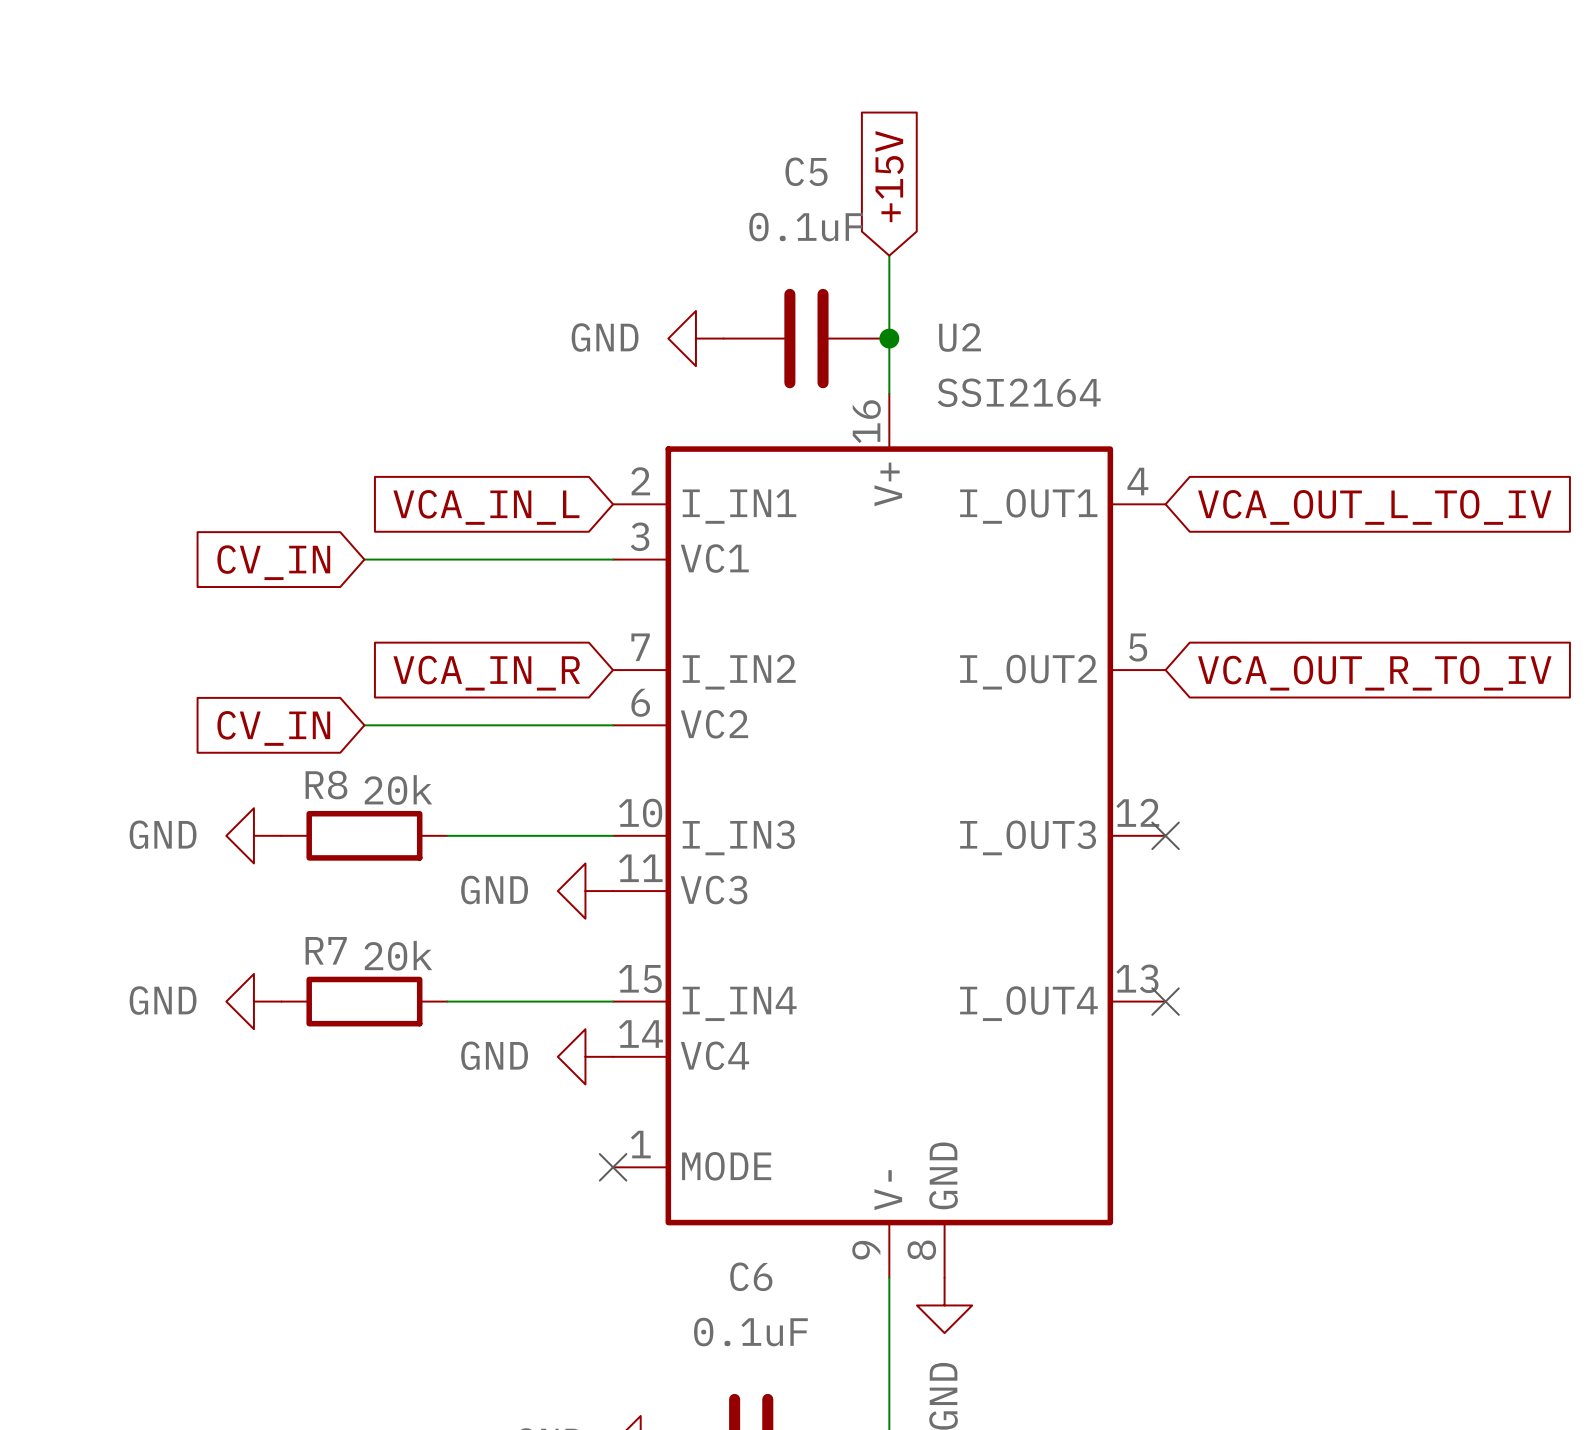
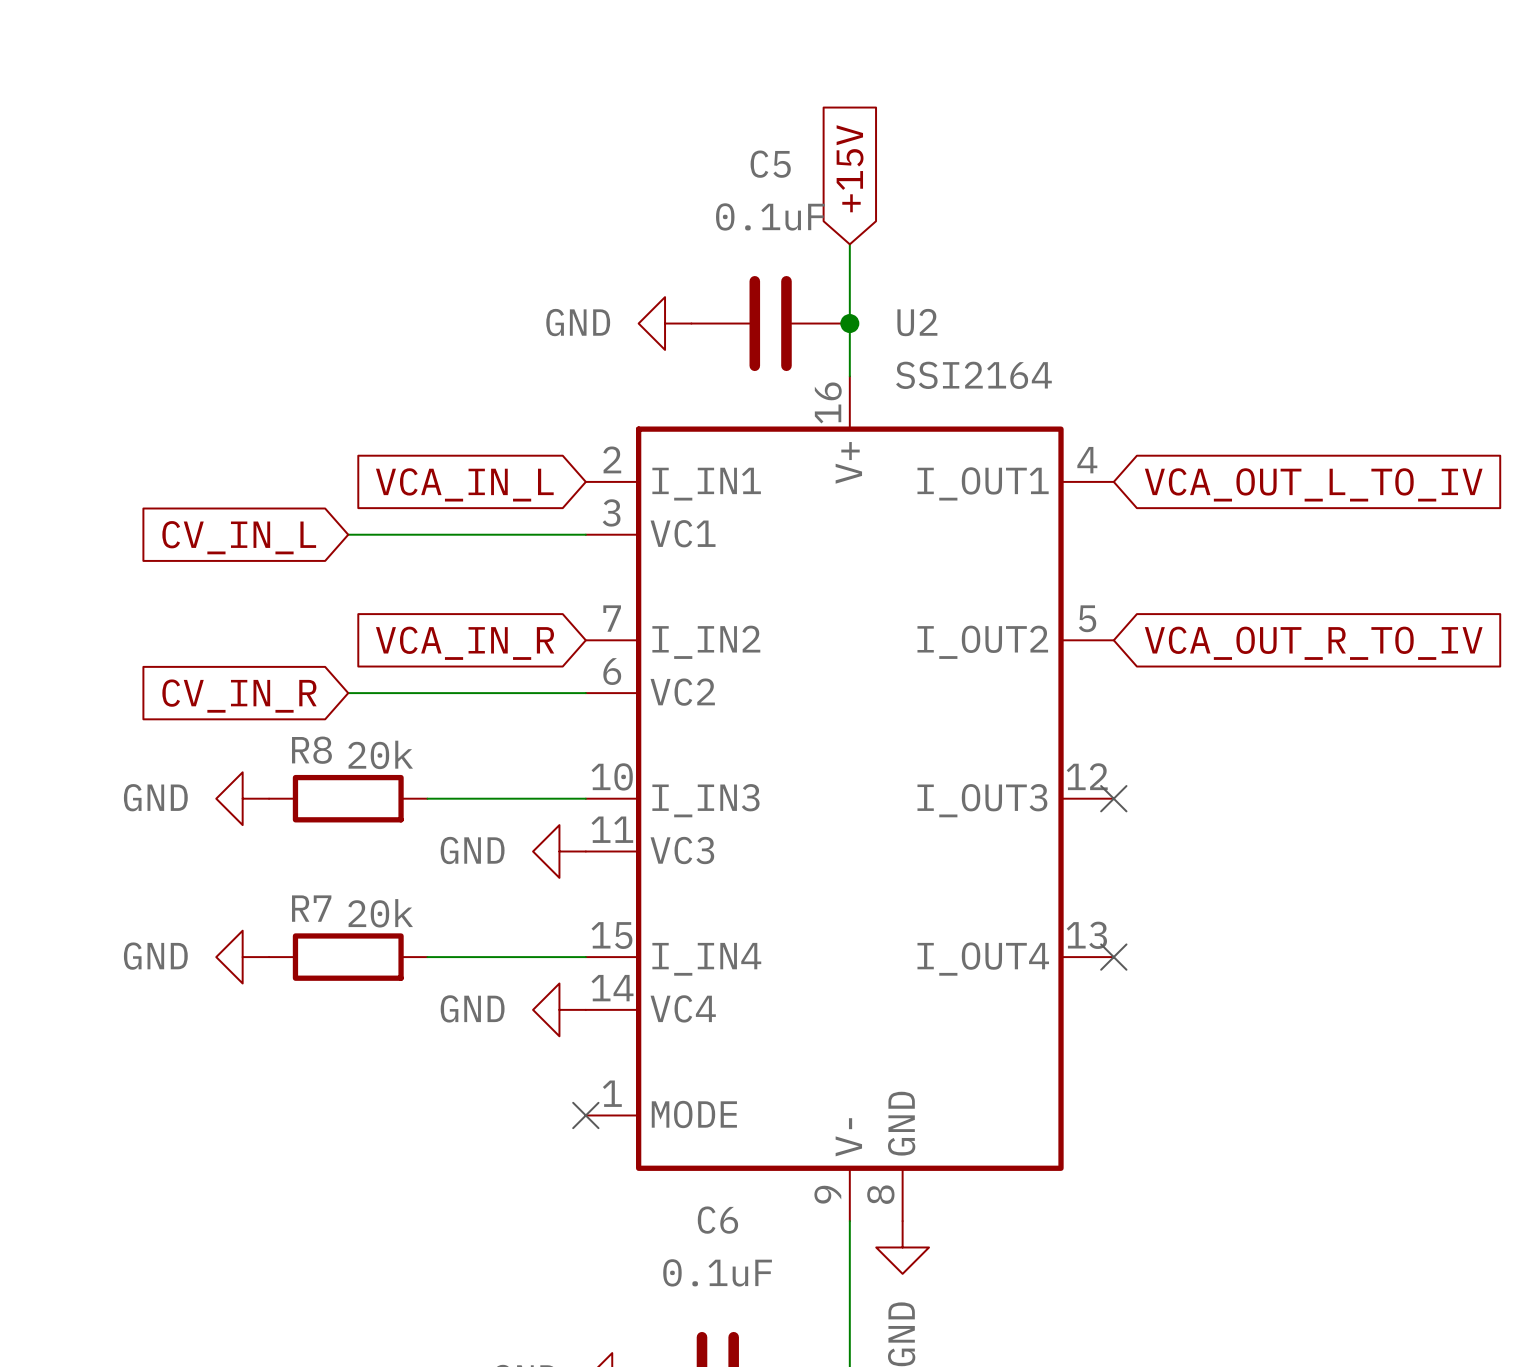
global label: CV_IN (273, 562) -> CV_IN_L (239, 537)
global label: CV_IN (273, 728) -> CV_IN_R (239, 696)

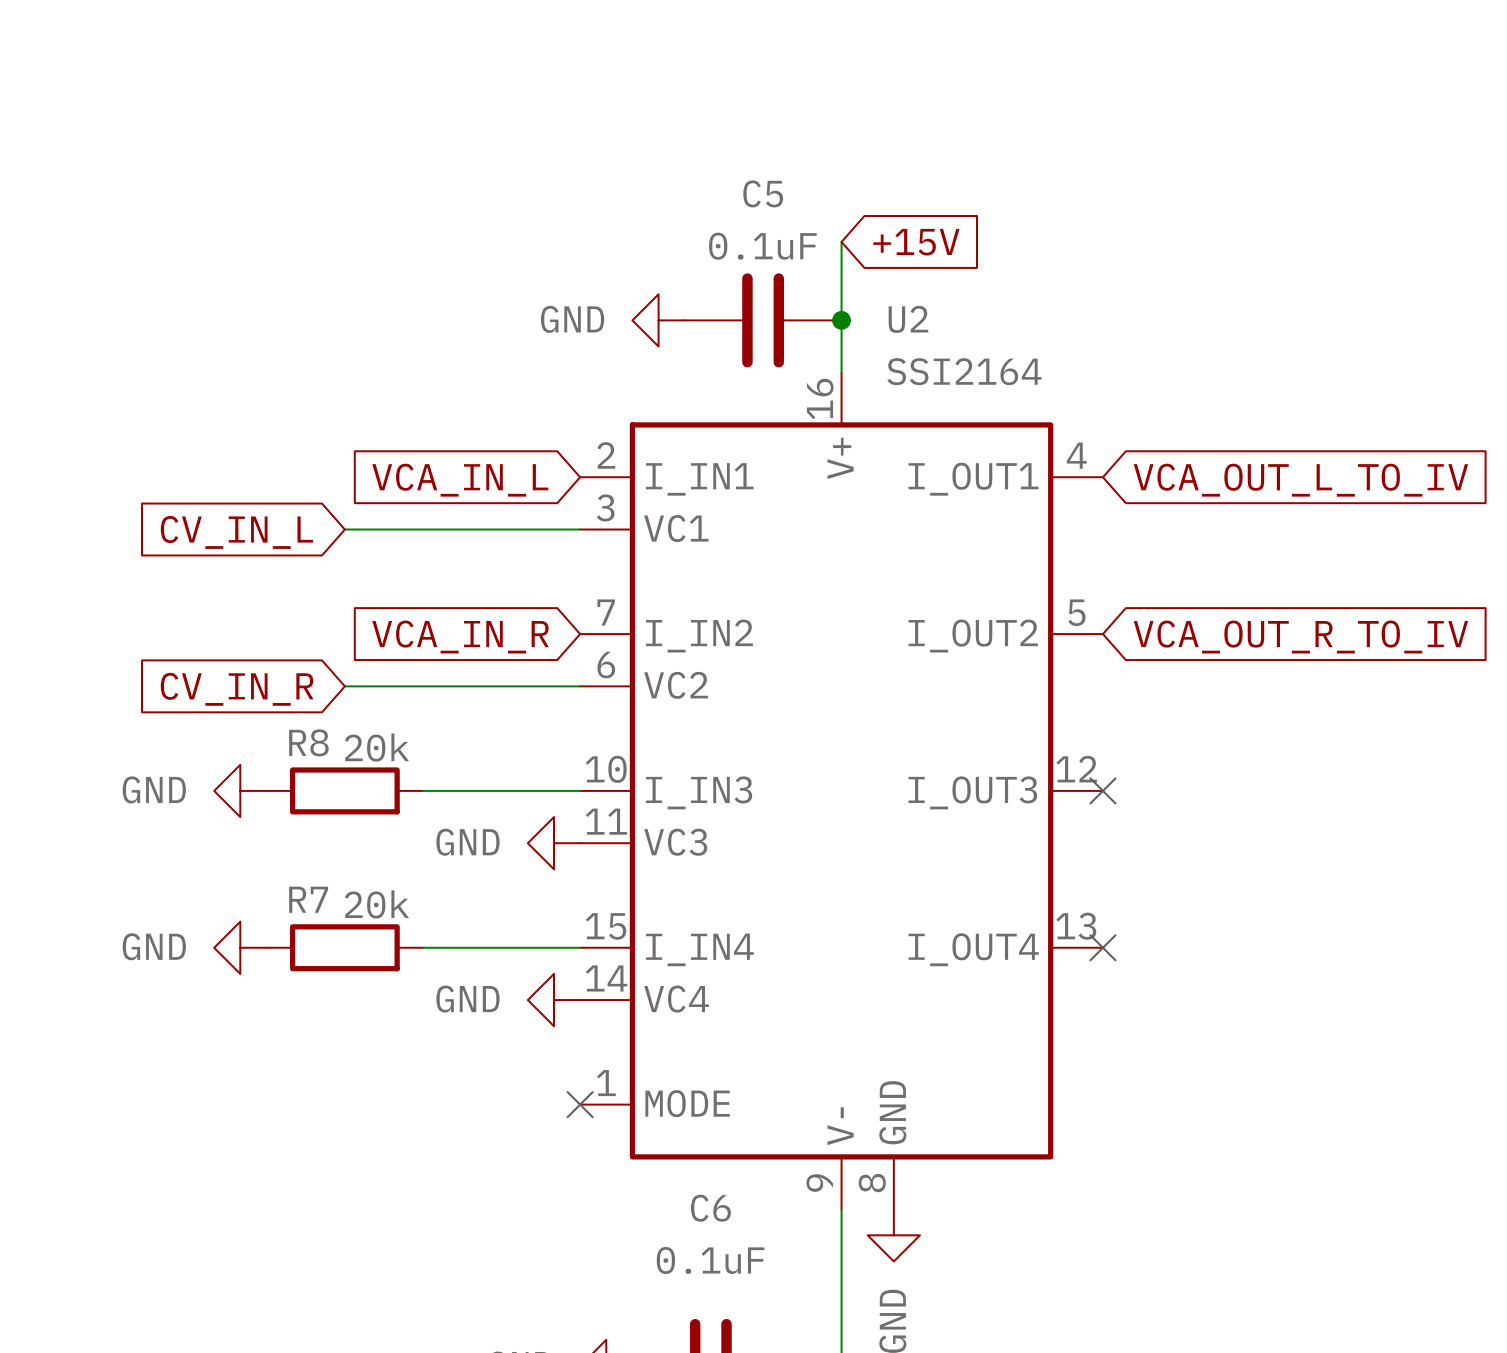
C5 name position: C5 (770, 164) -> C5 (763, 193)
global label rotation: 0° (850, 168) -> 90° clockwise (916, 242)
C5 value position: 0.1uF (770, 216) -> 0.1uF (762, 246)

